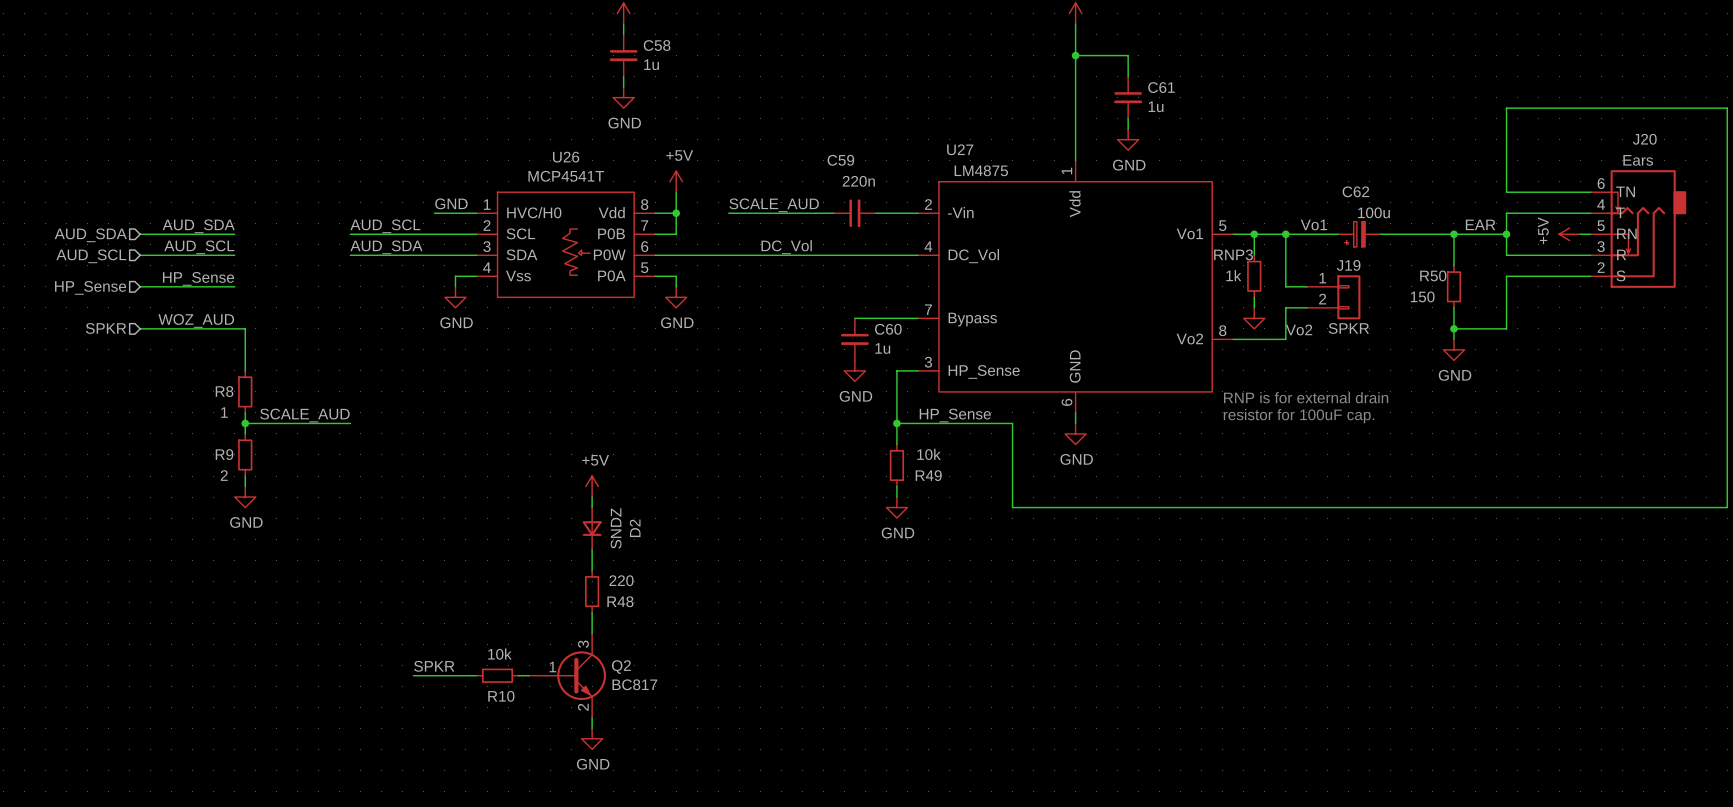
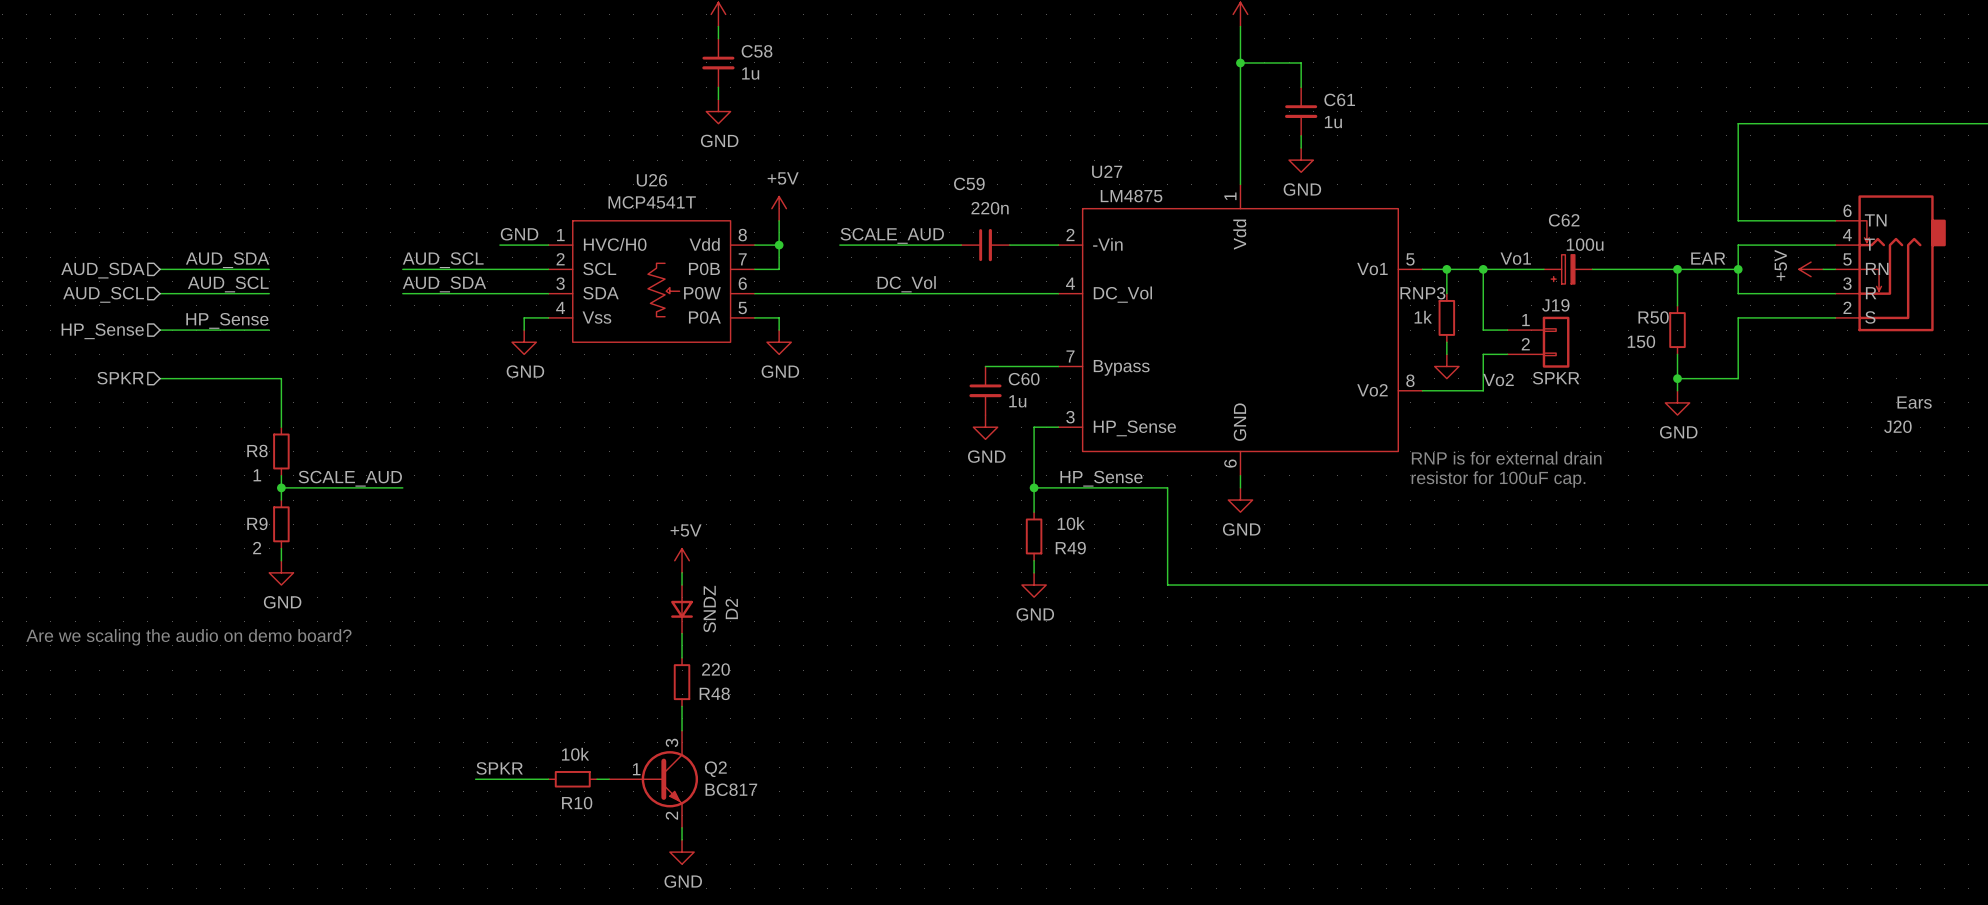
J20 name position: J20 (1644, 139) -> J20 (1897, 426)
J20 value position: Ears (1638, 160) -> Ears (1914, 402)
label: WOZ_AUD (196, 320) -> none
text: none -> Are we scaling the audio on demo board? (188, 637)

